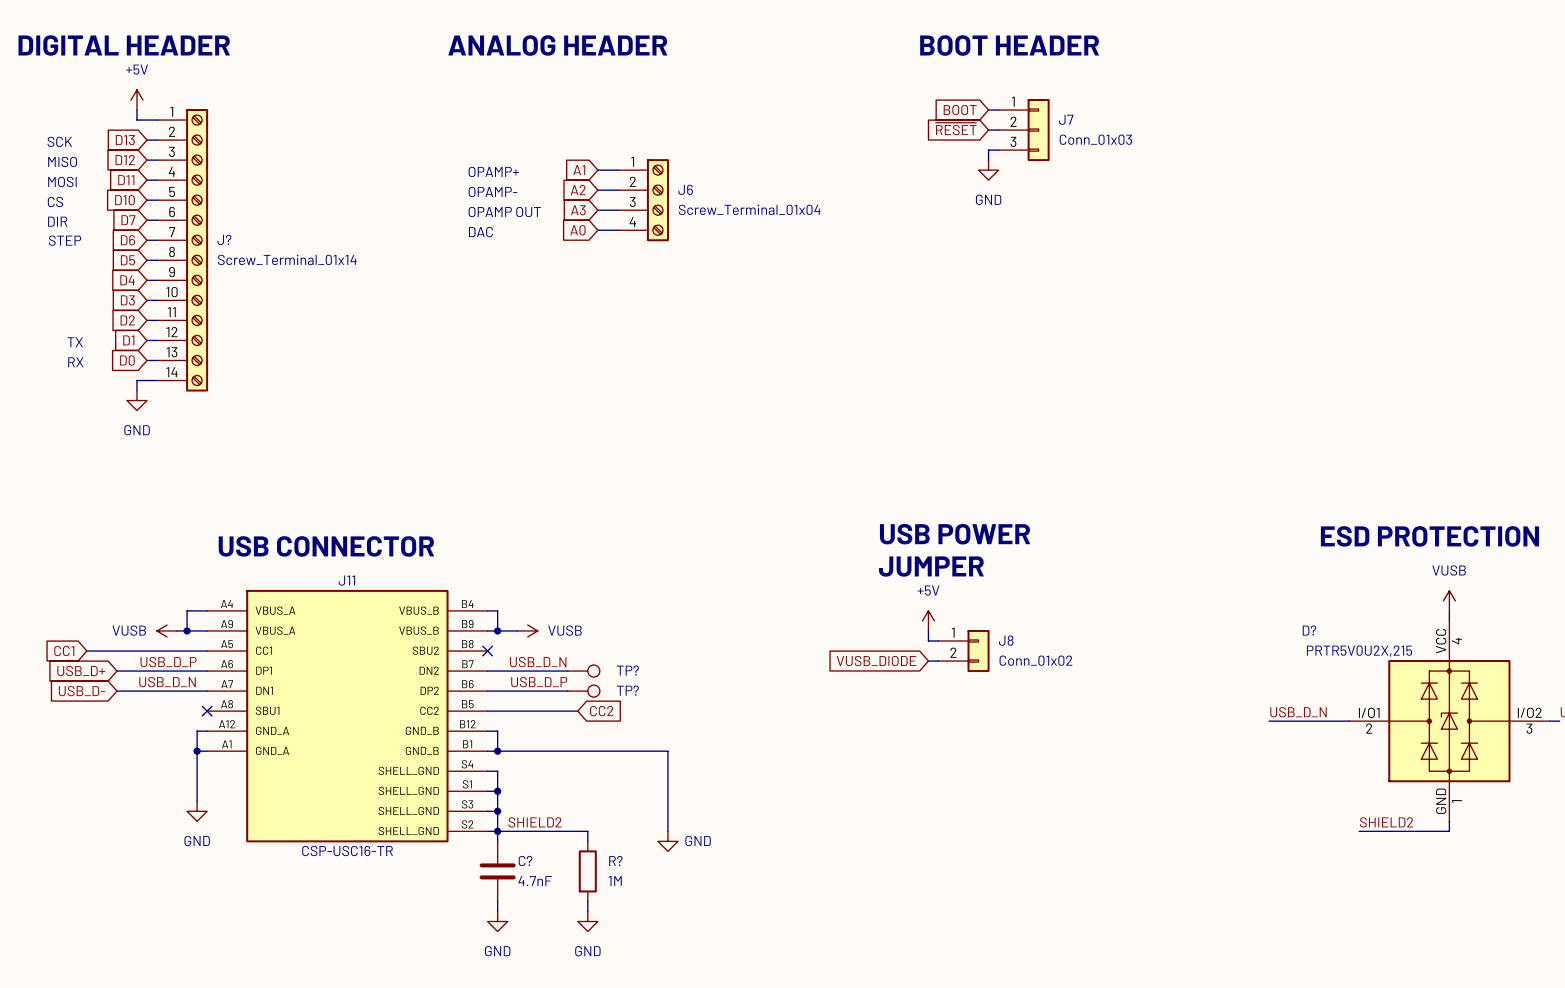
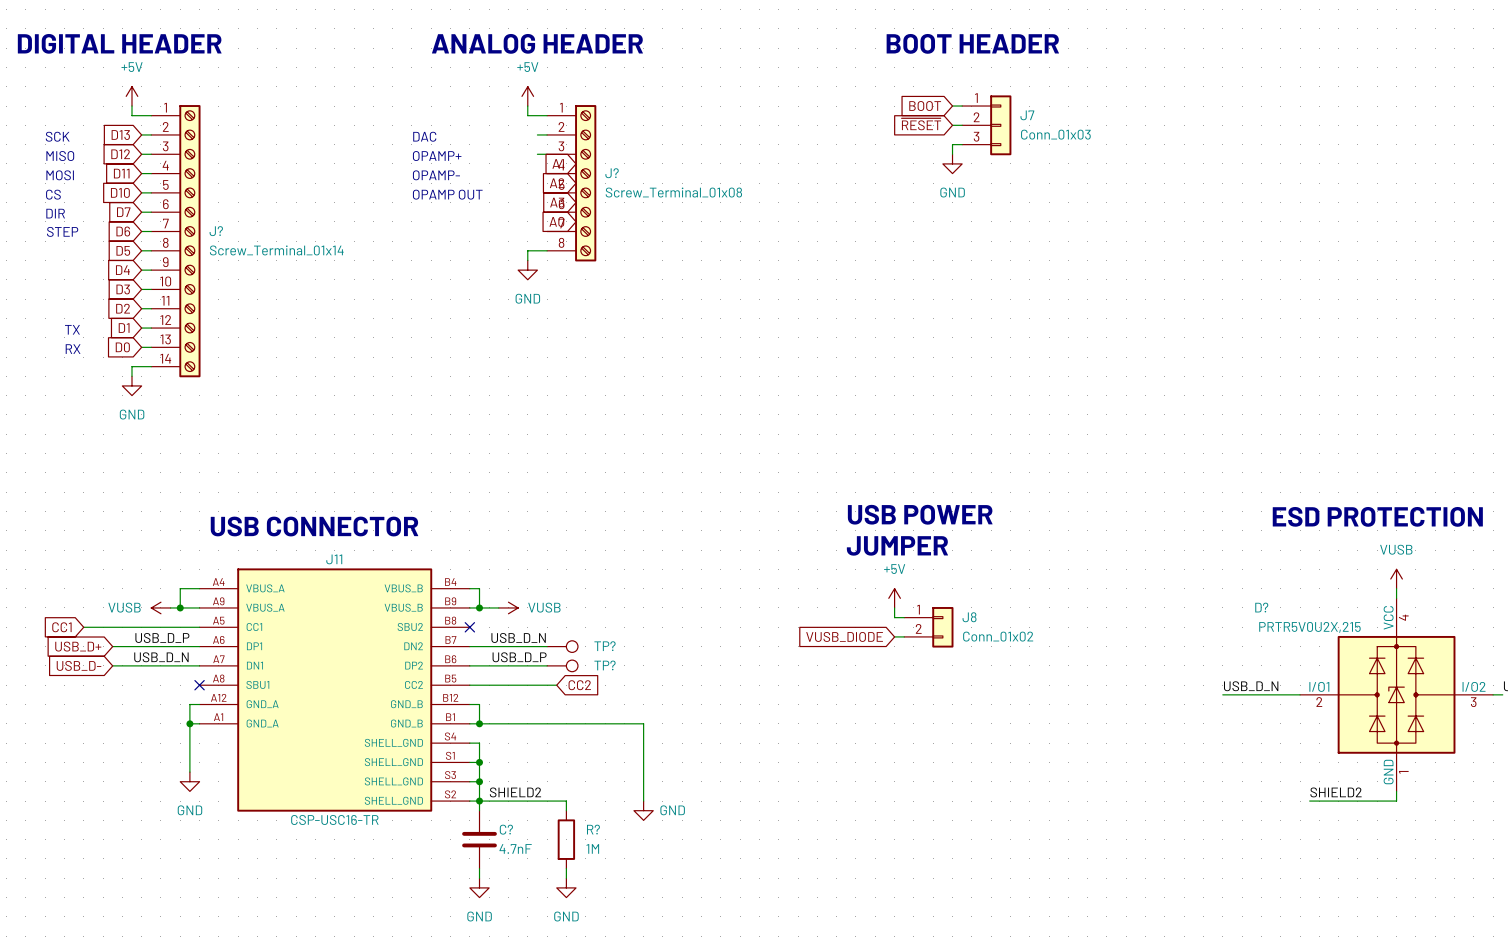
power symbol: none -> +5V (527, 96)
wire: none -> (527, 106) (527, 115) (547, 115)
wire: none -> (537, 134) (547, 134)
wire: none -> (537, 154) (547, 154)
text position: OPAMP+ (493, 171) -> OPAMP+ (437, 156)
J?: none -> Screw_Terminal_01x08 (571, 183)
text position: OPAMP- (493, 191) -> OPAMP- (436, 175)
J6: Screw_Terminal_01x04 (643, 200) -> none
text position: OPAMP OUT (504, 212) -> OPAMP OUT (447, 194)
text position: DAC (480, 232) -> DAC (424, 136)
wire: none -> (547, 250) (527, 250) (527, 260)
power symbol: none -> GND (527, 270)

